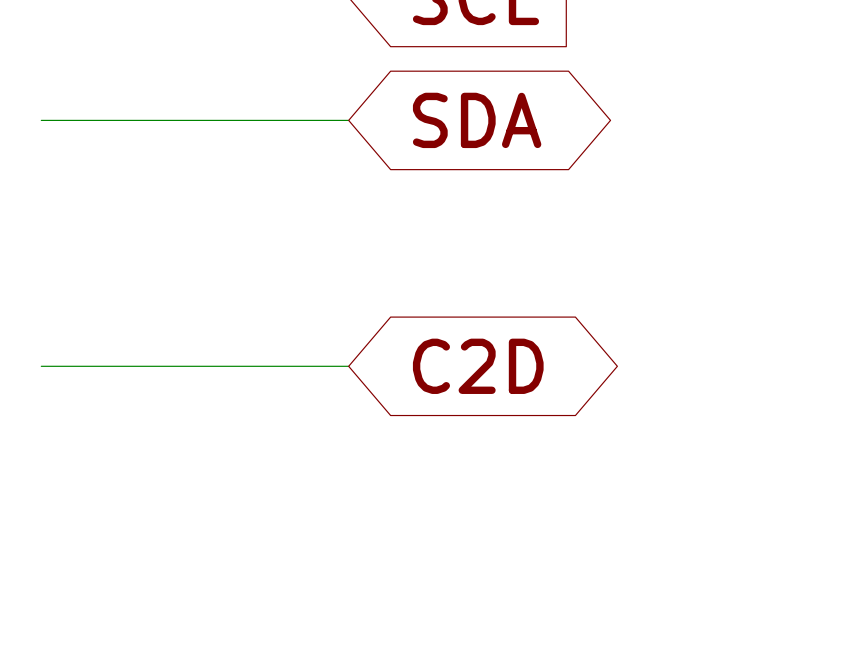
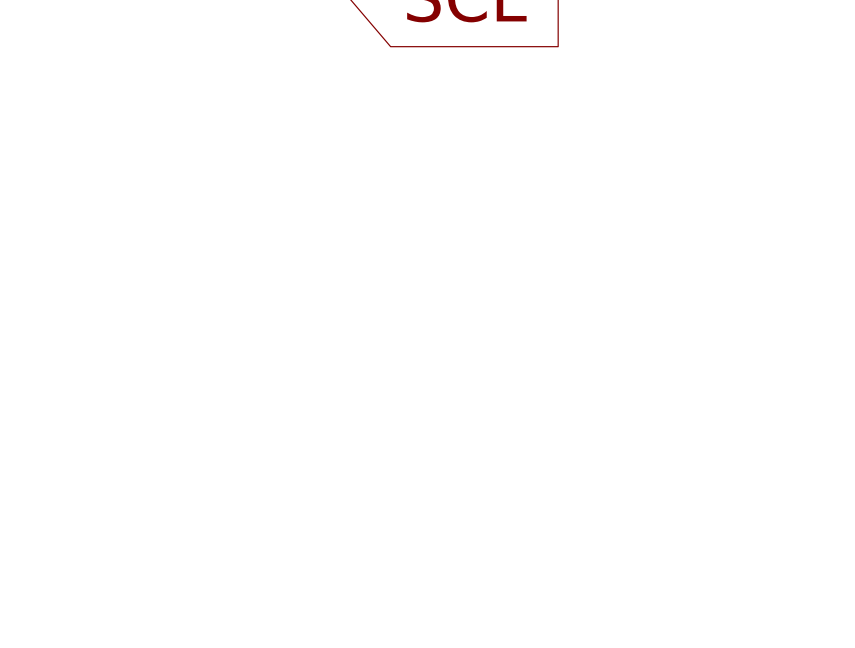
wire: (41, 120) (348, 120) -> none
global label: SDA (477, 120) -> none
wire: (41, 366) (348, 366) -> none
global label: C2D (478, 366) -> none

